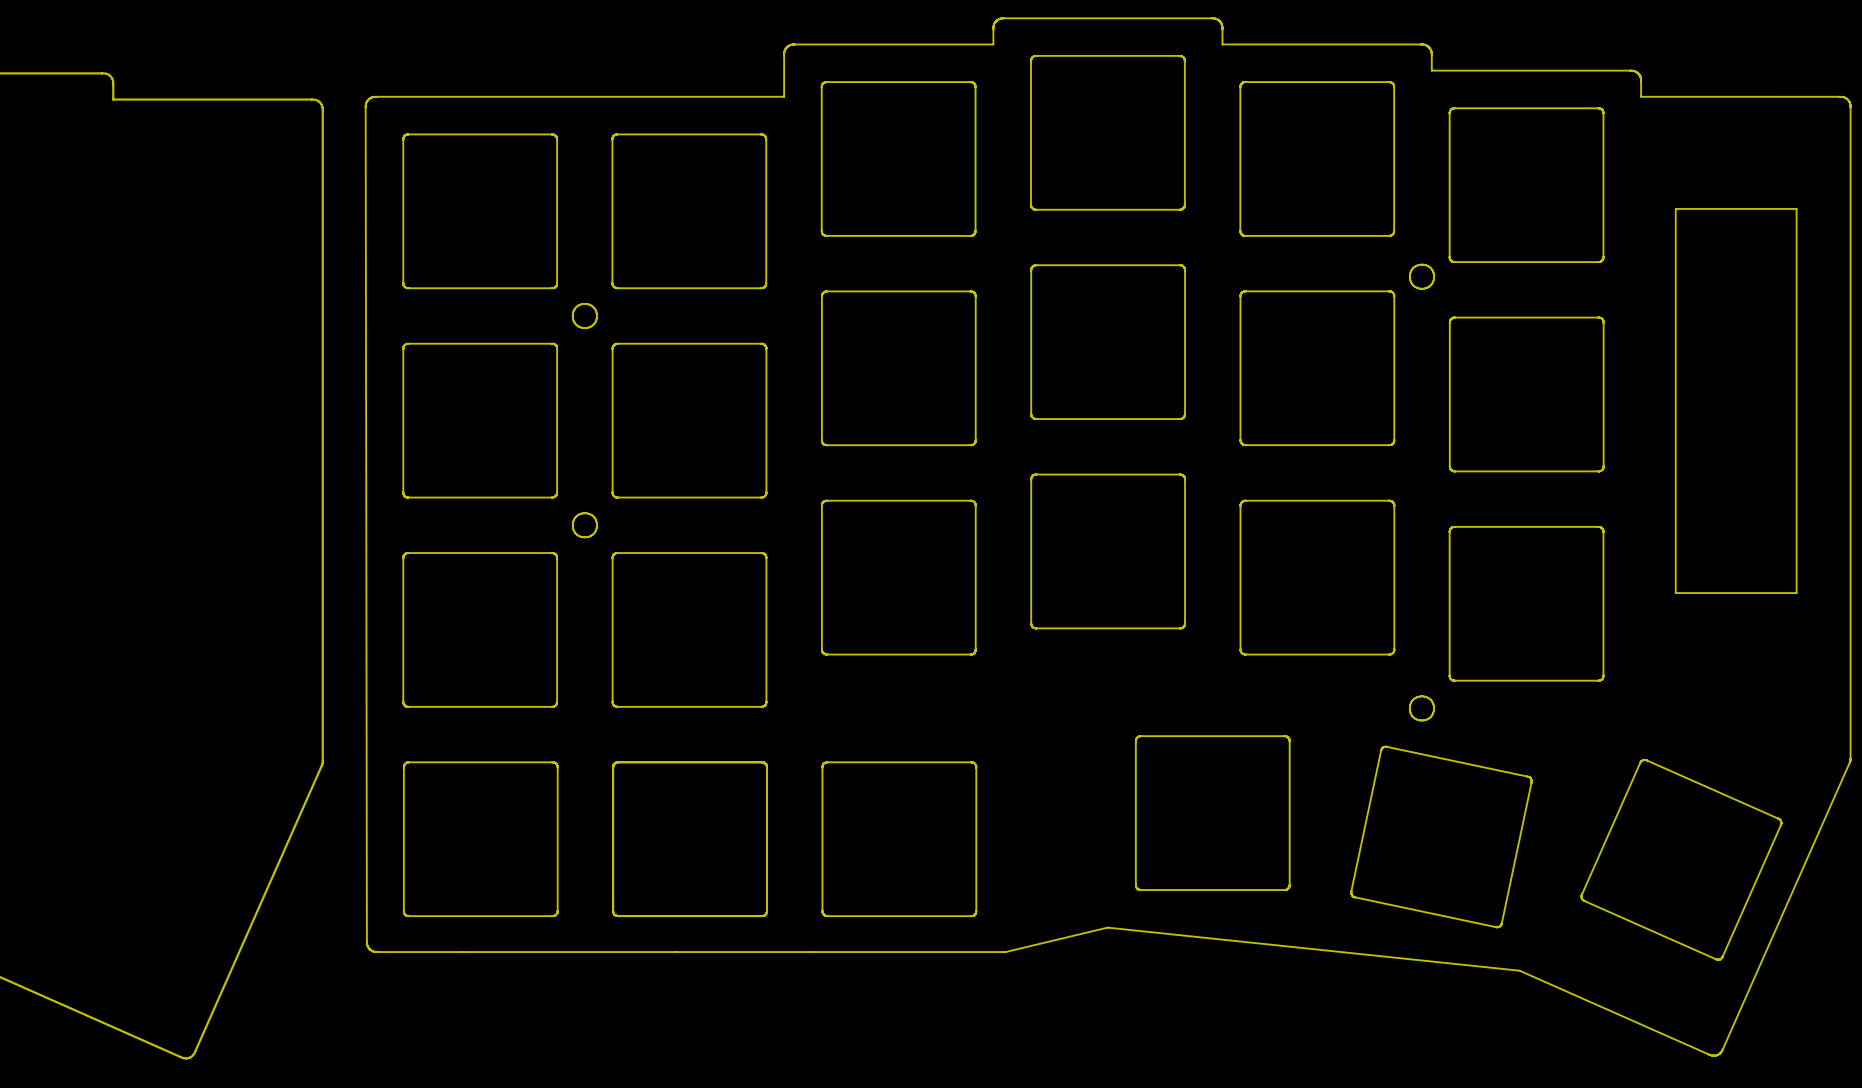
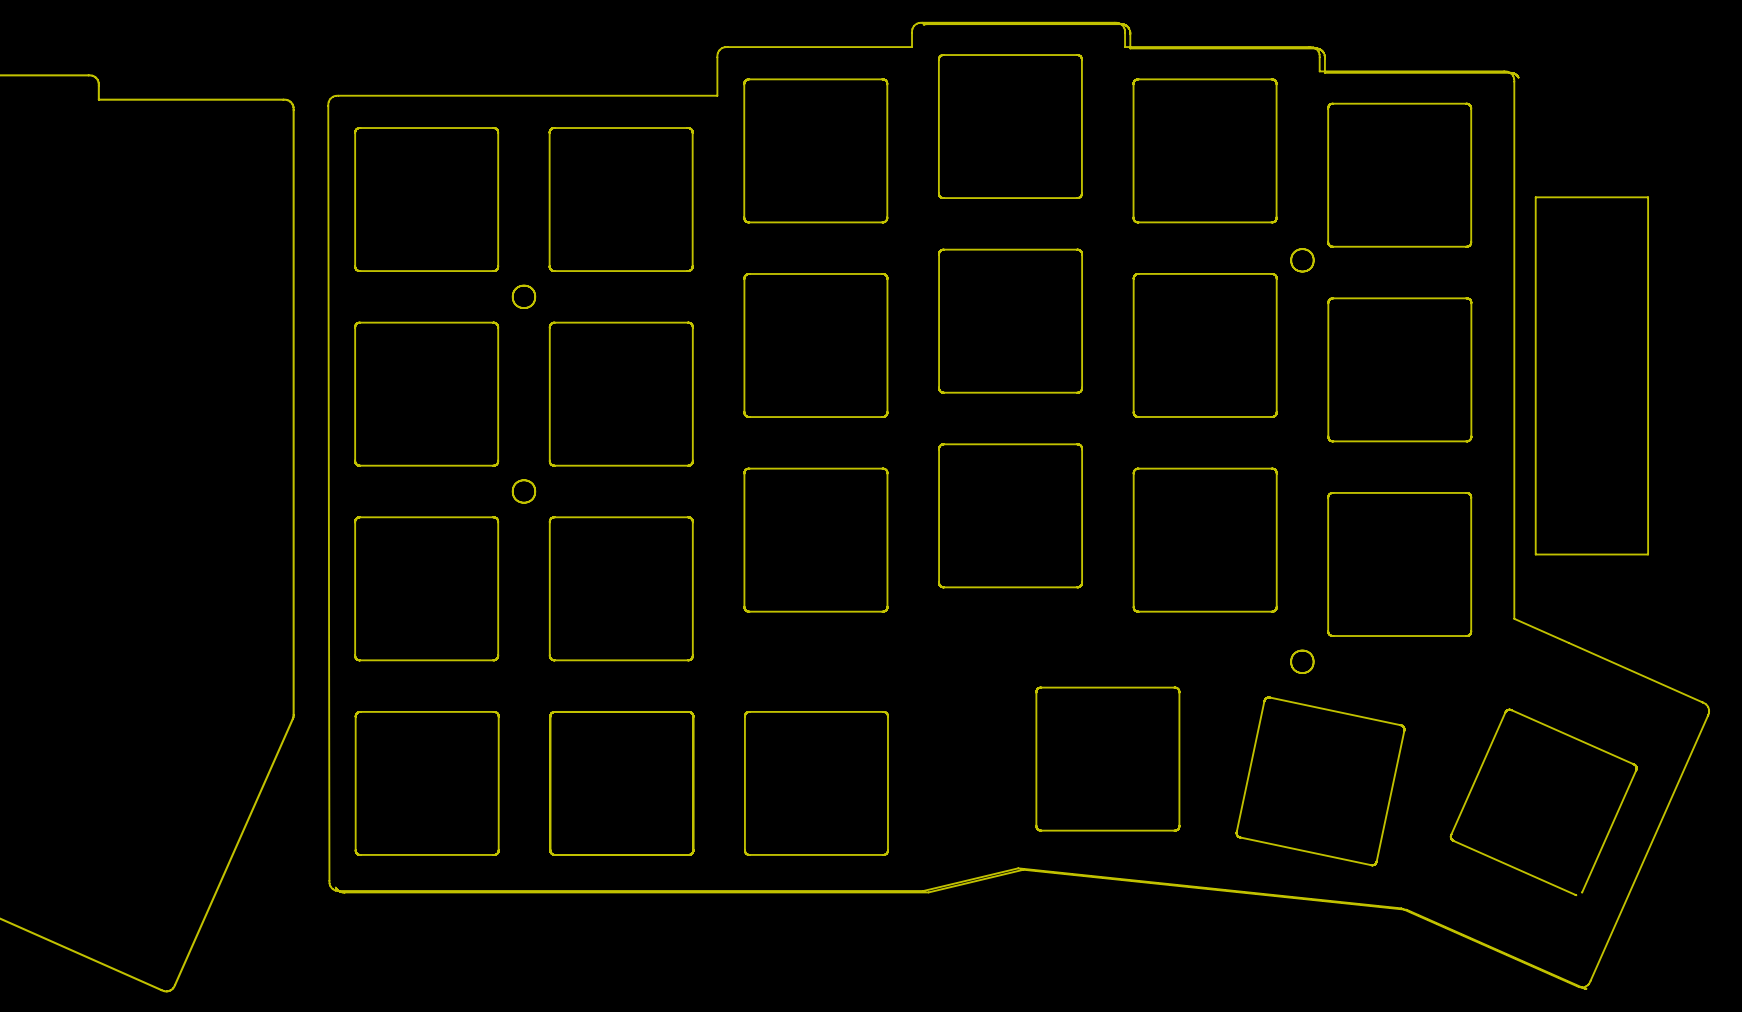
board edge: (998, 19) (993, 25) (993, 44) (790, 44) -> none
board edge: (789, 45) (784, 53) (784, 96) (372, 97) -> none
board edge: (1035, 55) (1179, 55) -> (943, 55) (1077, 55)
board edge: (1184, 60) (1184, 204) -> (1081, 59) (1081, 193)
board edge: (1031, 61) (1031, 205) -> (938, 59) (938, 193)
board edge: none -> (1504, 71) (1319, 71) (1319, 52) (1311, 47) (1125, 47) (1124, 28) (1116, 22) (921, 22) (916, 24) (912, 28) (912, 47) (723, 47) (717, 54) (717, 95) (337, 95) (332, 97) (328, 105) (329, 884) (333, 889) (339, 891) (923, 891) (1018, 868) (1401, 908) (1583, 987) (1590, 981) (1708, 715) (1708, 707) (1702, 702)
board edge: none -> (1504, 71) (1511, 73) (1514, 80) (1514, 618) (1702, 702)
board edge: (1640, 77) (1641, 96) (1839, 96) -> none
board edge: (970, 82) (826, 82) -> (882, 79) (748, 79)
board edge: (1244, 82) (1389, 82) -> (1137, 79) (1271, 79)
board edge: (975, 86) (975, 230) -> (887, 83) (887, 217)
board edge: (1394, 86) (1394, 230) -> (1276, 83) (1276, 217)
board edge: (821, 87) (821, 231) -> (744, 84) (744, 218)
board edge: (1240, 87) (1240, 231) -> (1133, 84) (1133, 218)
board edge: (1839, 96) (1845, 97) (1849, 102) -> none
board edge: (370, 97) (366, 101) (365, 107) (367, 945) -> none
board edge: (1850, 103) (1850, 760) -> none
board edge: (1454, 108) (1598, 108) -> (1332, 103) (1466, 103)
board edge: (1603, 112) (1603, 256) -> (1471, 107) (1471, 241)
board edge: (1449, 113) (1449, 257) -> (1328, 108) (1328, 242)
board edge: (407, 134) (551, 134) -> (359, 128) (493, 128)
board edge: (616, 134) (761, 134) -> (553, 128) (687, 128)
board edge: (557, 138) (557, 283) -> (498, 132) (498, 266)
board edge: (766, 138) (766, 283) -> (692, 132) (692, 266)
board edge: (403, 139) (403, 283) -> (355, 132) (355, 266)
board edge: (612, 139) (612, 283) -> (549, 132) (549, 266)
board edge: (1675, 208) (1675, 593) (1796, 593) (1796, 208) (1675, 208) -> (1535, 197) (1535, 554) (1648, 554) (1648, 197) (1535, 197)
board edge: (1036, 209) (1180, 209) -> (943, 198) (1077, 198)
board edge: (826, 235) (971, 235) -> (749, 222) (883, 222)
board edge: (1245, 235) (1389, 235) -> (1138, 222) (1272, 222)
board edge: (1599, 262) (1454, 262) -> (1467, 246) (1332, 246)
board edge: (1420, 264) (1412, 269) (1409, 278) (1413, 285) (1423, 288) (1431, 284) (1433, 275) (1430, 267) (1420, 264) -> (1301, 249) (1293, 253) (1291, 261) (1294, 268) (1303, 271) (1311, 267) (1313, 258) (1310, 251) (1301, 249)
board edge: (1035, 265) (1179, 265) -> (943, 249) (1077, 249)
board edge: (1185, 269) (1185, 413) -> (1082, 253) (1082, 387)
board edge: (1031, 270) (1031, 414) -> (939, 254) (939, 388)
board edge: (552, 288) (408, 288) -> (494, 271) (359, 271)
board edge: (761, 288) (617, 288) -> (688, 271) (554, 271)
board edge: (970, 291) (826, 291) -> (882, 273) (748, 274)
board edge: (1244, 291) (1389, 291) -> (1137, 273) (1271, 273)
board edge: (975, 295) (975, 440) -> (887, 278) (887, 412)
board edge: (1394, 295) (1394, 440) -> (1276, 278) (1276, 412)
board edge: (821, 296) (821, 440) -> (744, 278) (744, 412)
board edge: (1240, 296) (1240, 440) -> (1133, 278) (1133, 412)
board edge: (584, 303) (575, 307) (572, 315) (575, 324) (584, 328) (593, 324) (596, 315) (593, 307) (584, 303) -> (522, 285) (514, 290) (512, 298) (516, 305) (525, 308) (533, 303) (535, 295) (531, 288) (522, 285)
board edge: (1454, 317) (1598, 317) -> (1332, 298) (1466, 298)
board edge: (1449, 322) (1449, 466) -> (1328, 303) (1328, 437)
board edge: (1603, 322) (1603, 466) -> (1471, 302) (1471, 436)
board edge: (407, 343) (551, 343) -> (359, 322) (493, 322)
board edge: (616, 343) (761, 343) -> (553, 322) (688, 322)
board edge: (403, 348) (403, 493) -> (355, 327) (355, 461)
board edge: (557, 348) (557, 492) -> (498, 326) (498, 460)
board edge: (612, 348) (612, 493) -> (549, 327) (549, 461)
board edge: (766, 348) (766, 492) -> (692, 326) (692, 460)
board edge: (1036, 419) (1180, 419) -> (943, 392) (1077, 392)
board edge: (827, 445) (971, 445) -> (749, 417) (883, 417)
board edge: (1390, 445) (1245, 445) -> (1272, 416) (1138, 416)
board edge: (1454, 471) (1599, 471) -> (1333, 441) (1467, 441)
board edge: (1035, 474) (1179, 474) -> (943, 444) (1077, 444)
board edge: (1031, 479) (1031, 623) -> (939, 449) (939, 583)
board edge: (1185, 479) (1185, 623) -> (1082, 448) (1082, 582)
board edge: (552, 497) (408, 497) -> (494, 465) (359, 465)
board edge: (761, 497) (617, 497) -> (688, 465) (554, 465)
board edge: (970, 500) (826, 500) -> (882, 468) (748, 468)
board edge: (1389, 500) (1244, 500) -> (1271, 468) (1137, 468)
board edge: (821, 505) (821, 650) -> (744, 473) (744, 607)
board edge: (975, 505) (975, 649) -> (887, 472) (887, 606)
board edge: (1240, 505) (1240, 650) -> (1133, 473) (1133, 607)
board edge: (1394, 505) (1394, 649) -> (1276, 472) (1276, 606)
board edge: (584, 513) (575, 517) (572, 525) (575, 533) (584, 537) (593, 533) (596, 525) (593, 517) (584, 513) -> (522, 480) (514, 484) (512, 492) (516, 499) (525, 502) (533, 498) (535, 490) (531, 483) (522, 480)
board edge: (1598, 526) (1454, 526) -> (1466, 492) (1332, 492)
board edge: (1603, 531) (1603, 675) -> (1471, 497) (1471, 631)
board edge: (1449, 532) (1449, 676) -> (1328, 497) (1328, 631)
board edge: (407, 553) (551, 553) -> (359, 517) (493, 517)
board edge: (616, 553) (761, 553) -> (553, 517) (688, 517)
board edge: (557, 557) (557, 701) -> (498, 521) (498, 655)
board edge: (766, 557) (766, 701) -> (692, 521) (692, 655)
board edge: (403, 558) (403, 702) -> (355, 522) (355, 656)
board edge: (612, 558) (612, 702) -> (549, 522) (549, 656)
board edge: (1036, 628) (1180, 628) -> (943, 587) (1077, 587)
board edge: (827, 654) (971, 654) -> (749, 611) (883, 611)
board edge: (1245, 654) (1389, 654) -> (1138, 611) (1272, 611)
board edge: (1454, 680) (1599, 680) -> (1332, 636) (1467, 635)
board edge: (1420, 696) (1412, 701) (1409, 709) (1413, 717) (1423, 720) (1431, 715) (1433, 706) (1430, 699) (1420, 696) -> (1301, 650) (1293, 654) (1291, 663) (1294, 670) (1303, 672) (1311, 668) (1313, 660) (1310, 653) (1301, 650)
board edge: (552, 706) (408, 706) -> (494, 660) (359, 660)
board edge: (761, 706) (617, 706) -> (688, 660) (554, 660)
board edge: (1284, 736) (1140, 736) -> (1174, 687) (1040, 687)
board edge: (1289, 740) (1289, 884) -> (1179, 691) (1179, 825)
board edge: (1135, 741) (1135, 885) -> (1036, 692) (1036, 826)
board edge: (1386, 746) (1527, 776) -> (1269, 697) (1400, 725)
board edge: (1381, 750) (1351, 891) -> (1264, 701) (1236, 832)
board edge: (1646, 760) (1778, 818) -> (1511, 709) (1633, 764)
board edge: (1850, 761) (1722, 1049) (1714, 1055) -> none
board edge: (552, 762) (408, 762) -> (493, 711) (359, 711)
board edge: (761, 762) (617, 762) -> (688, 711) (554, 711)
board edge: (971, 762) (826, 762) -> (883, 711) (749, 711)
board edge: (1640, 763) (1581, 894) -> (1505, 712) (1451, 835)
board edge: (557, 766) (557, 911) -> (498, 716) (498, 850)
board edge: (766, 766) (766, 911) -> (693, 716) (693, 850)
board edge: (976, 766) (976, 911) -> (887, 716) (887, 850)
board edge: (403, 767) (403, 911) -> (355, 716) (355, 850)
board edge: (613, 767) (613, 911) -> (550, 716) (550, 850)
board edge: (822, 767) (822, 911) -> (744, 716) (744, 850)
board edge: (1531, 782) (1501, 923) -> (1404, 730) (1376, 861)
board edge: (1781, 824) (1722, 956) -> (1636, 769) (1582, 892)
board edge: (1141, 889) (1285, 889) -> (1041, 830) (1175, 830)
board edge: (1355, 897) (1496, 927) -> (1240, 837) (1371, 865)
board edge: (1584, 901) (1716, 959) -> (1453, 841) (1576, 895)
board edge: (408, 916) (553, 916) -> (360, 854) (494, 854)
board edge: (618, 916) (762, 916) -> (555, 854) (689, 854)
board edge: (827, 916) (971, 916) -> (749, 854) (883, 854)

